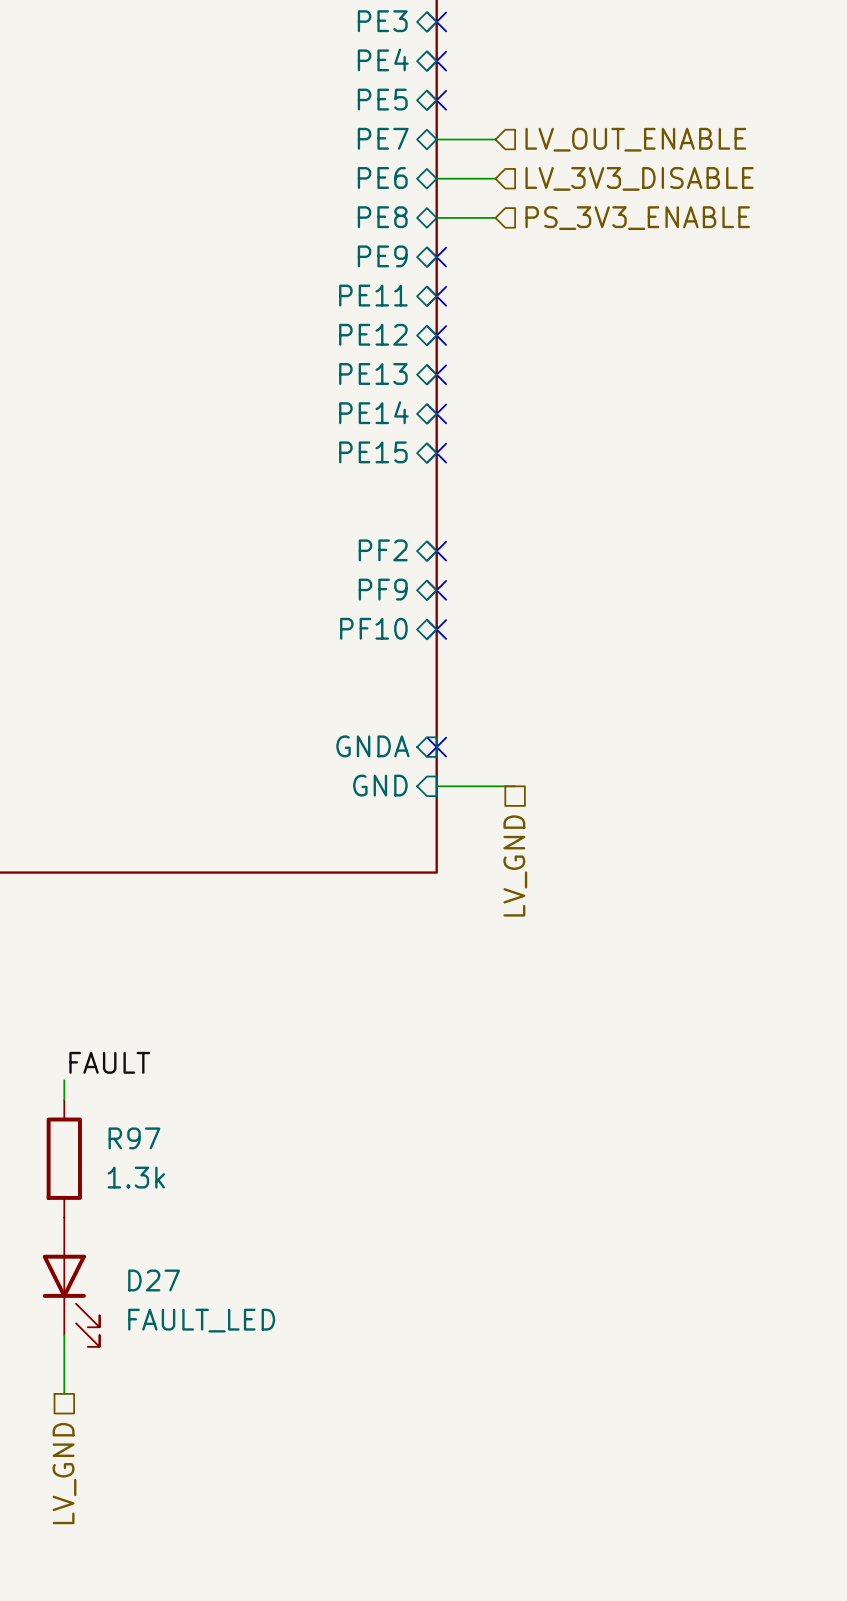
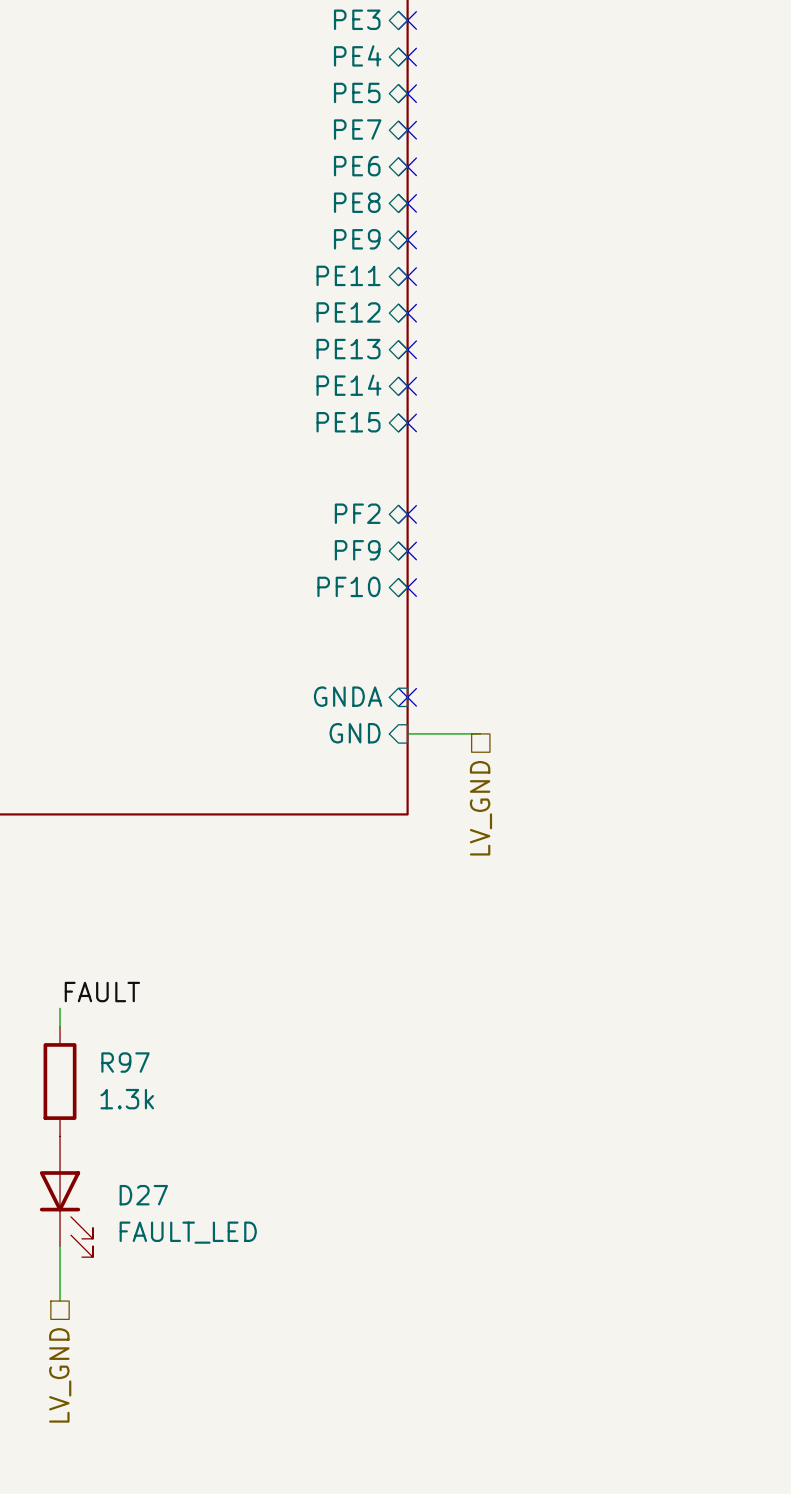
wire: (436, 139) (495, 139) -> none
no-connect mark: none -> (407, 130)
hierarchical label: LV_OUT_ENABLE (635, 139) -> none
wire: (436, 178) (495, 178) -> none
no-connect mark: none -> (407, 166)
hierarchical label: LV_3V3_DISABLE (639, 178) -> none
wire: (436, 217) (495, 217) -> none
no-connect mark: none -> (407, 203)
hierarchical label: PS_3V3_ENABLE (637, 218) -> none

